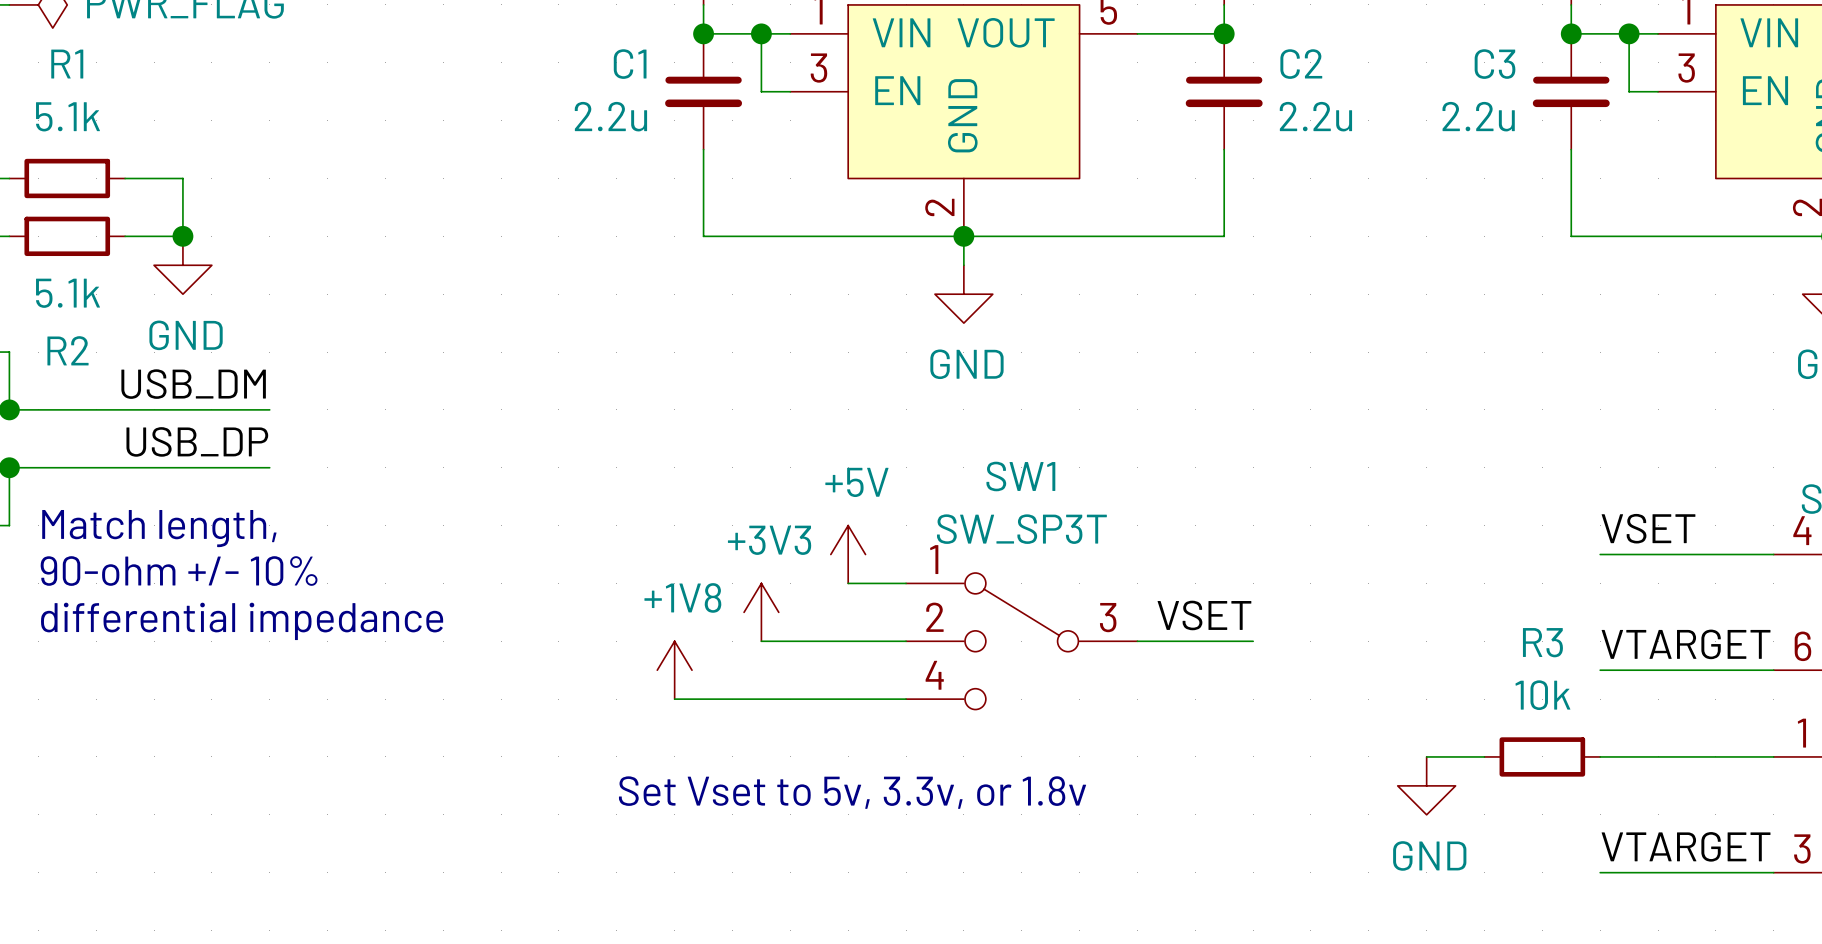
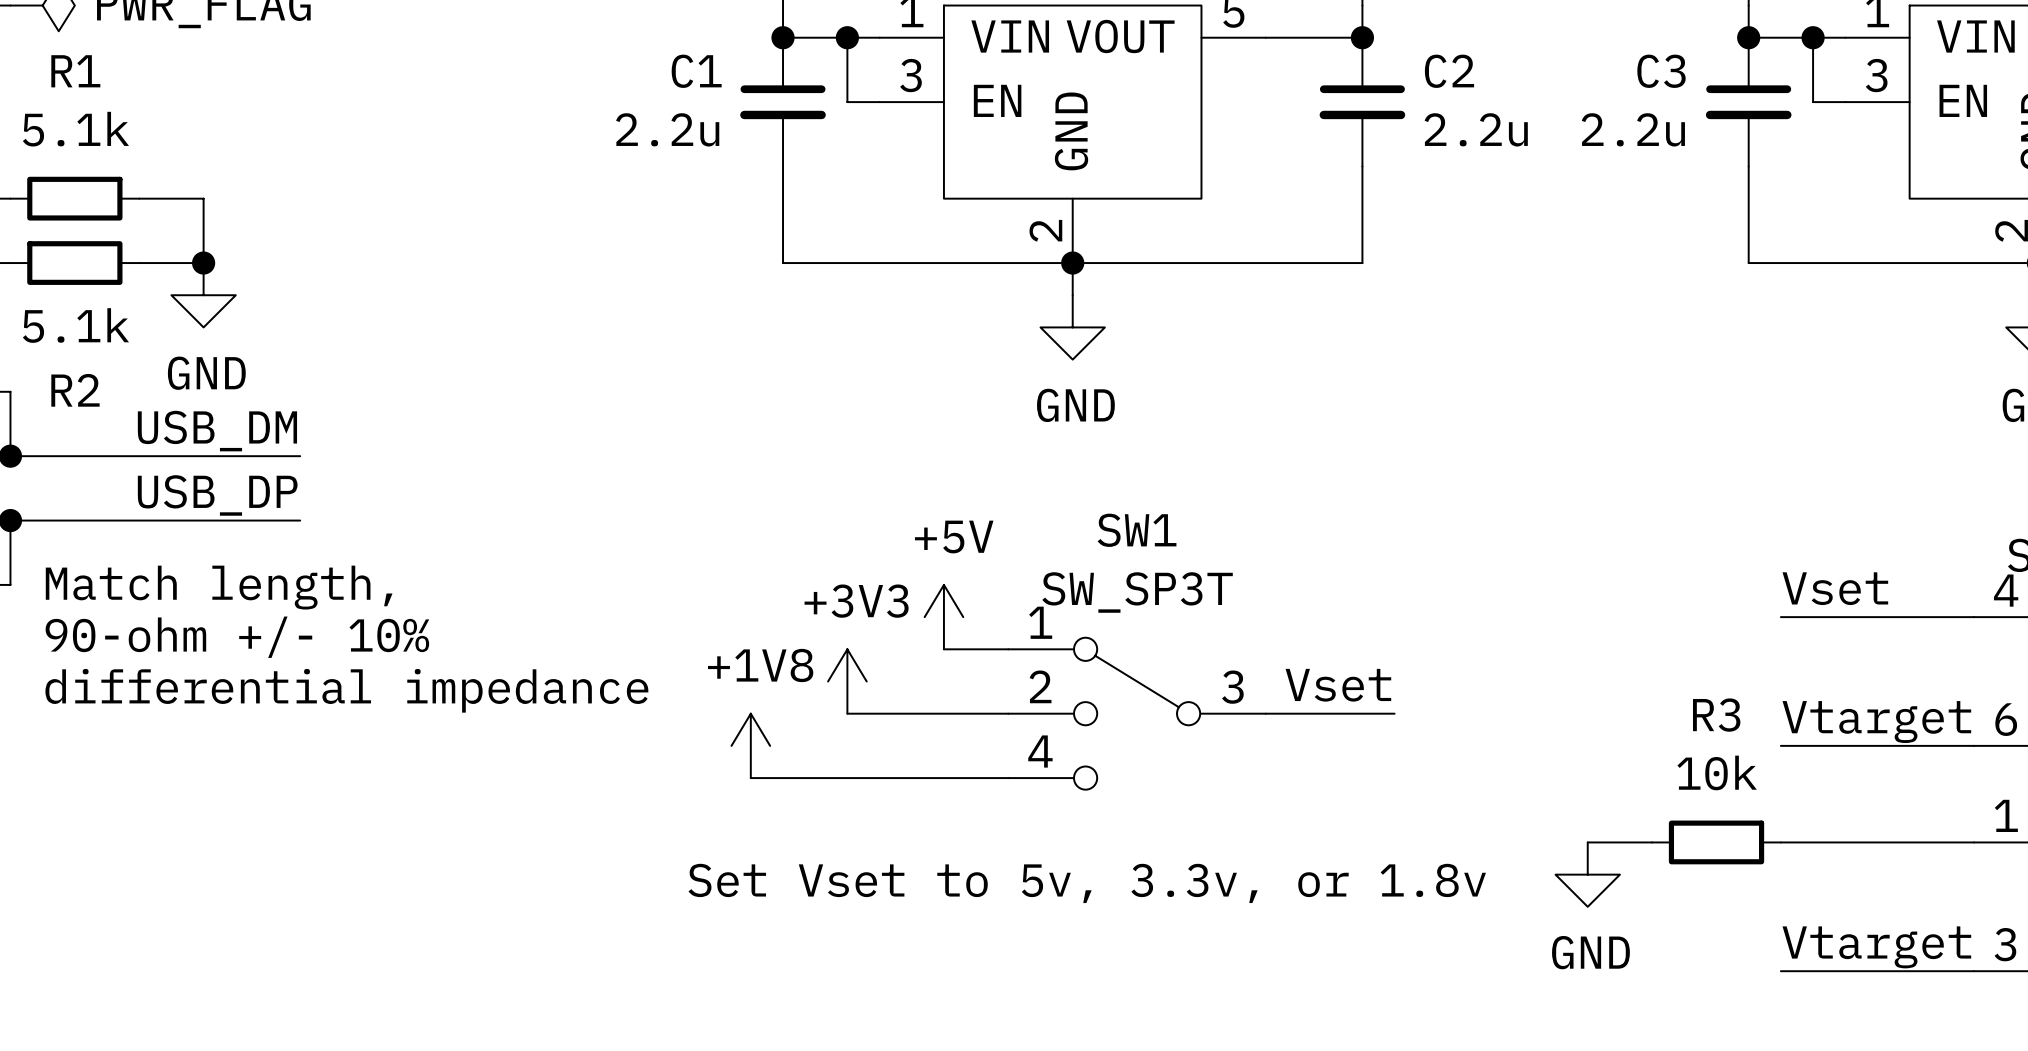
label: VSET (1648, 528) -> Vset (1835, 588)
label: VSET (1204, 615) -> Vset (1338, 685)
label: VTARGET (1686, 644) -> Vtarget (1876, 722)
label: VTARGET (1686, 846) -> Vtarget (1876, 947)

